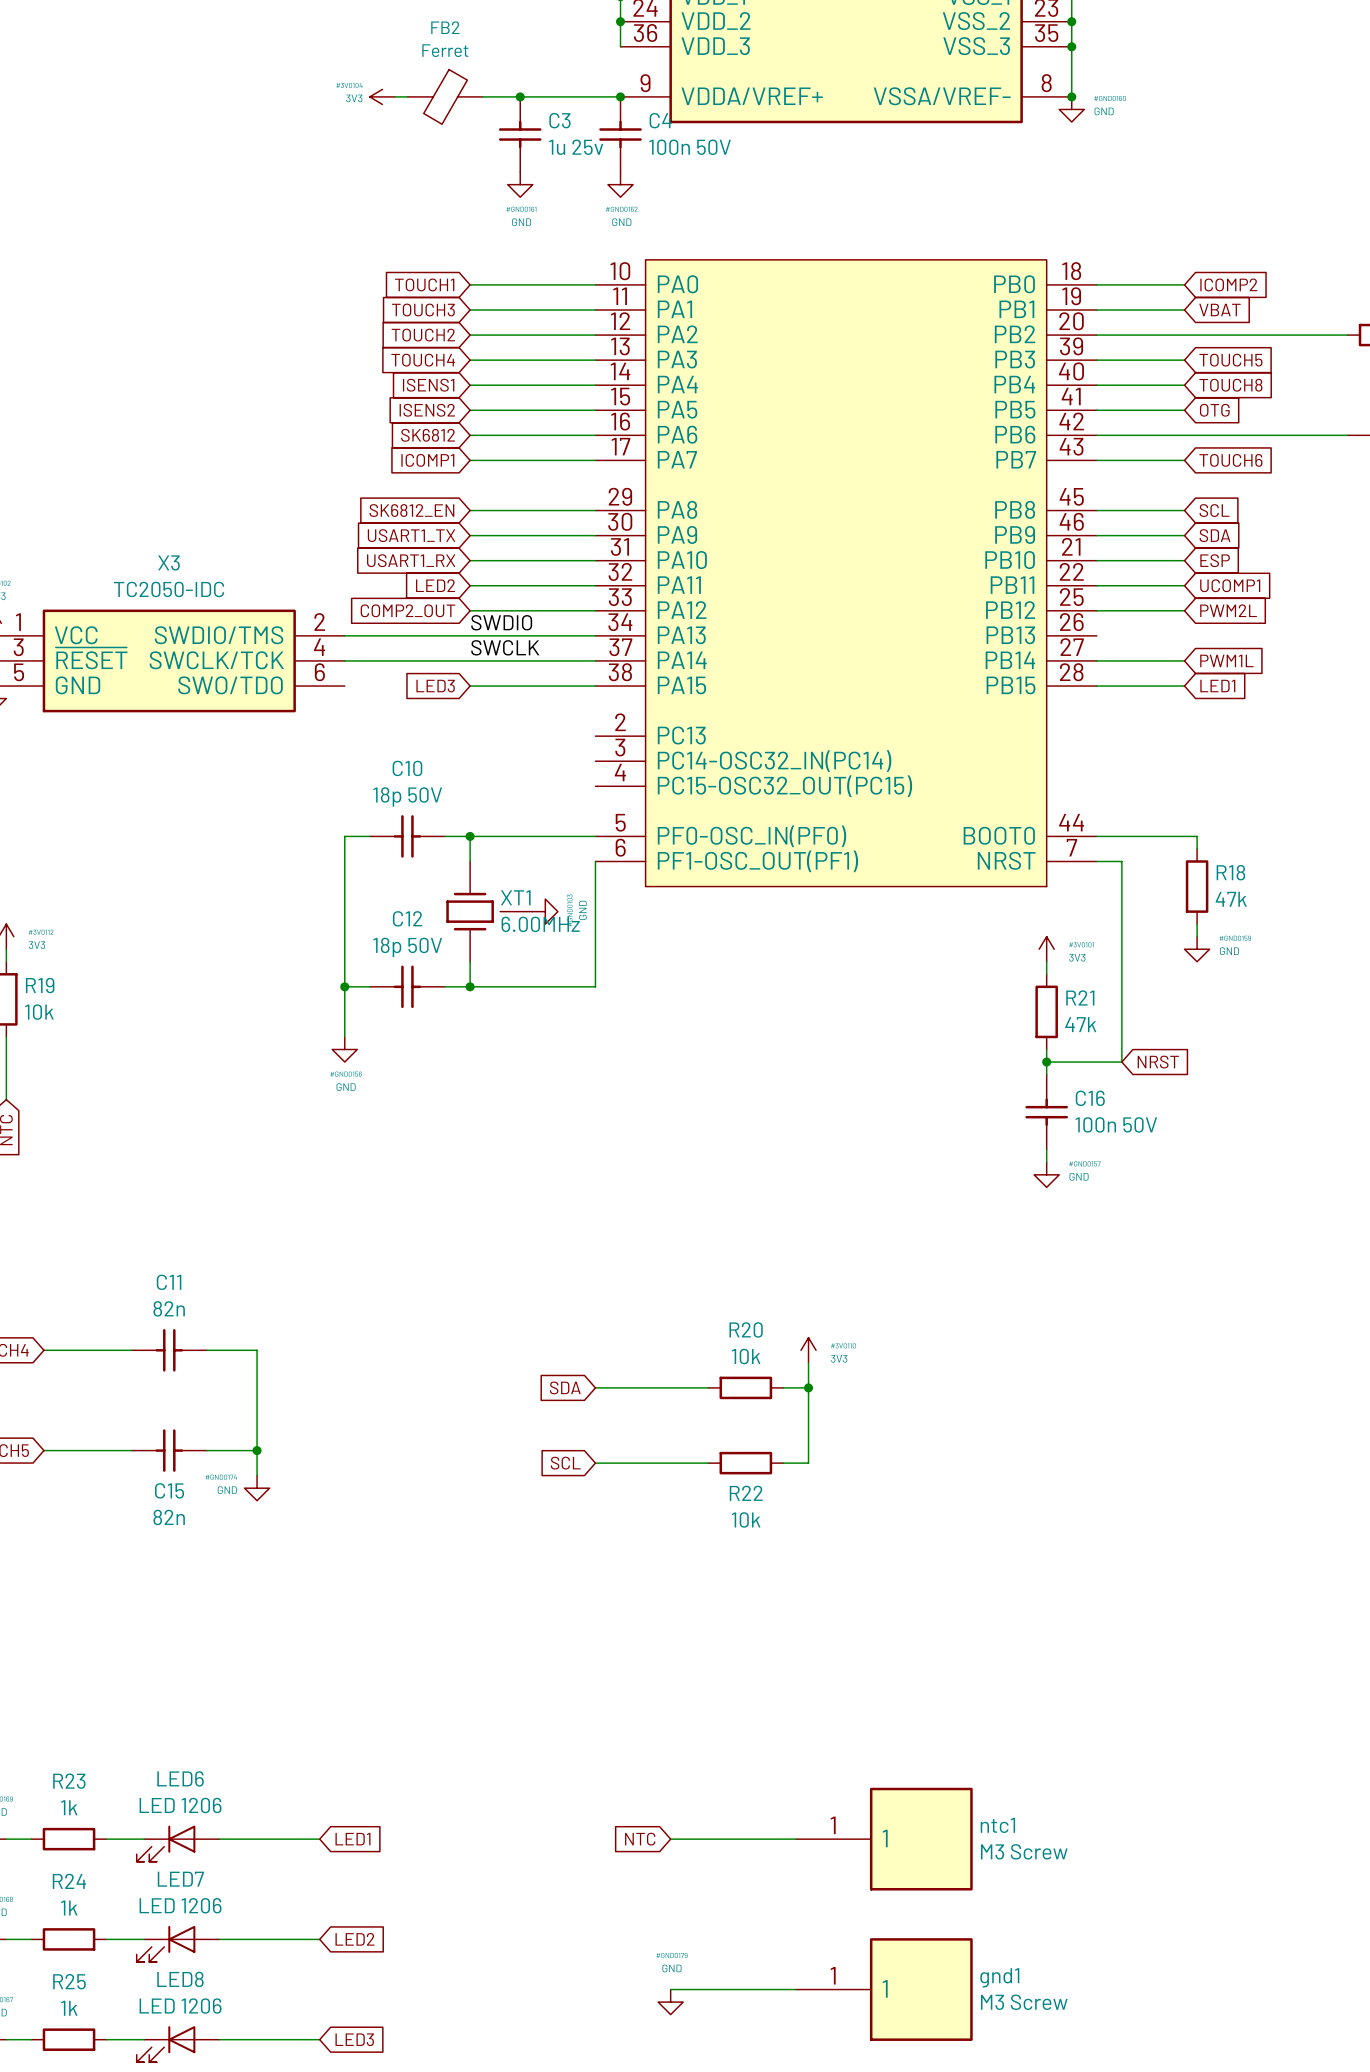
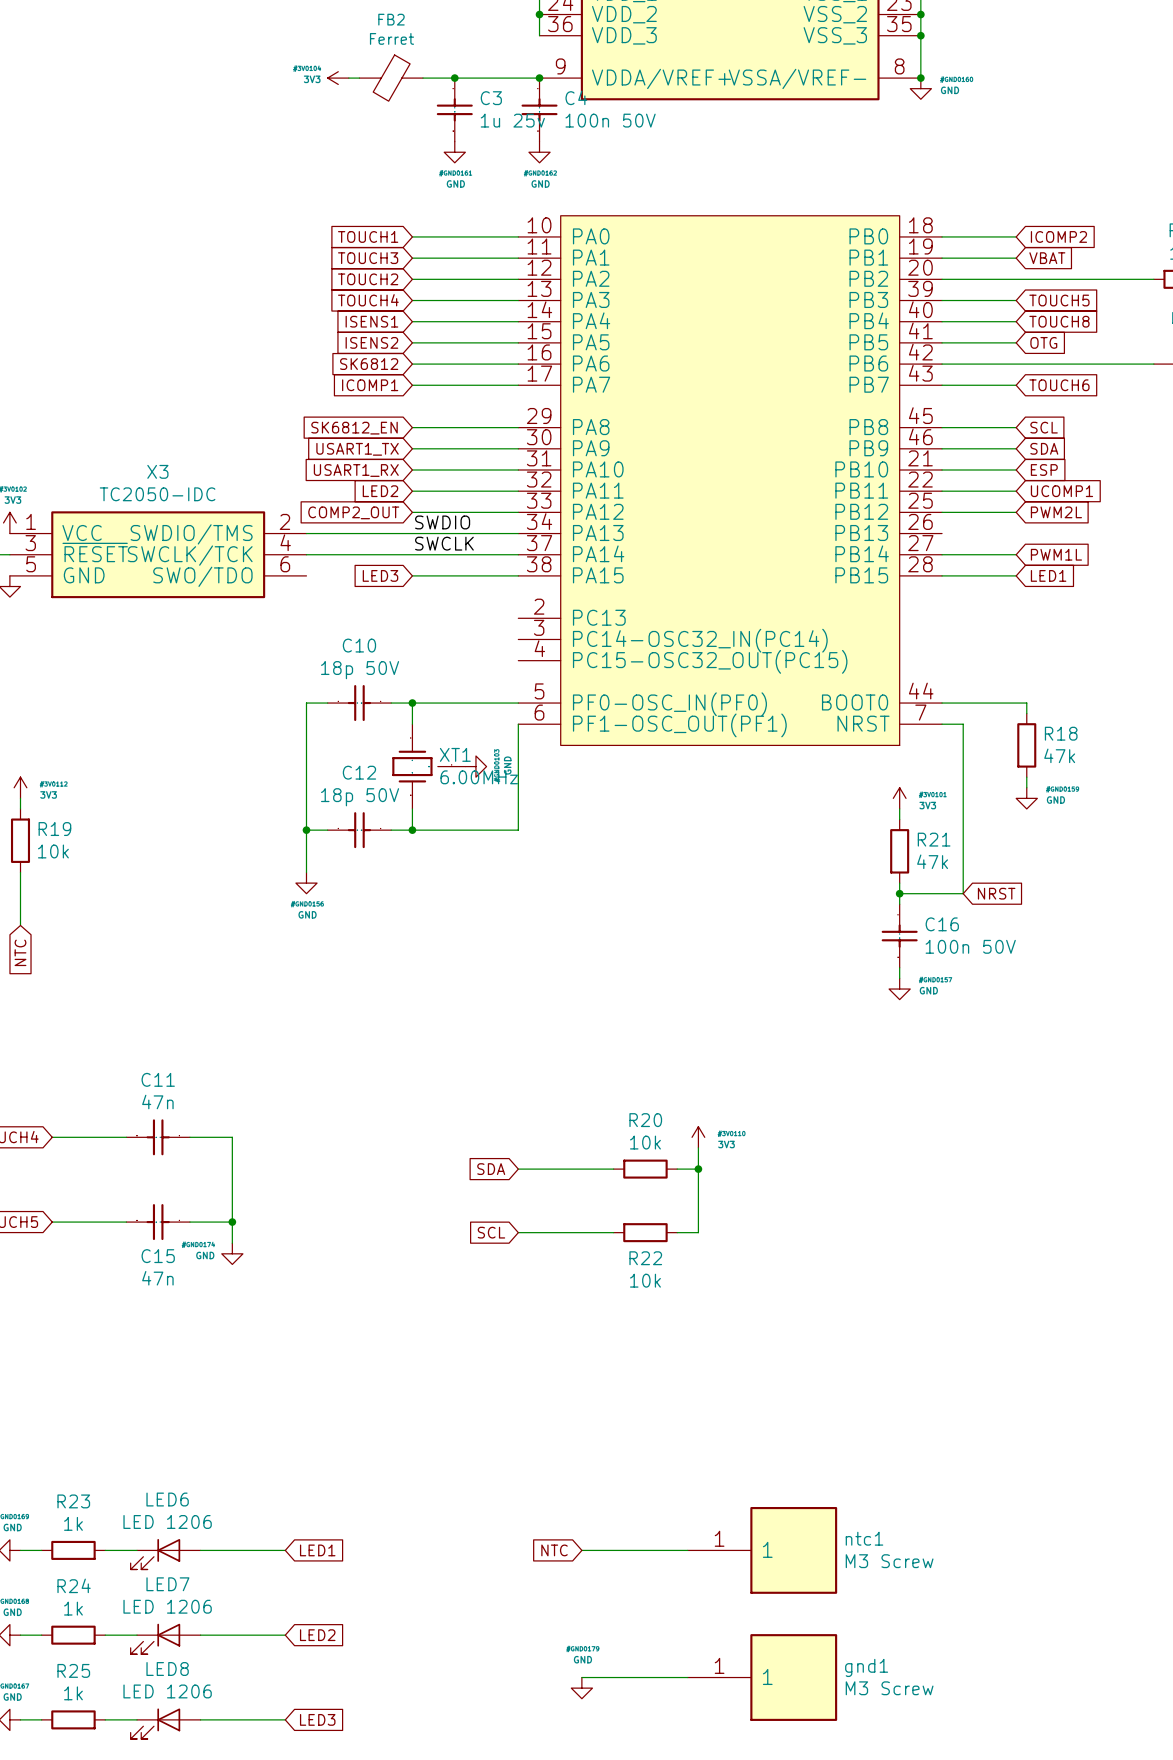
C11 value: 82n (169, 1308) -> 47n (157, 1102)
C15 value: 82n (169, 1517) -> 47n (157, 1278)

